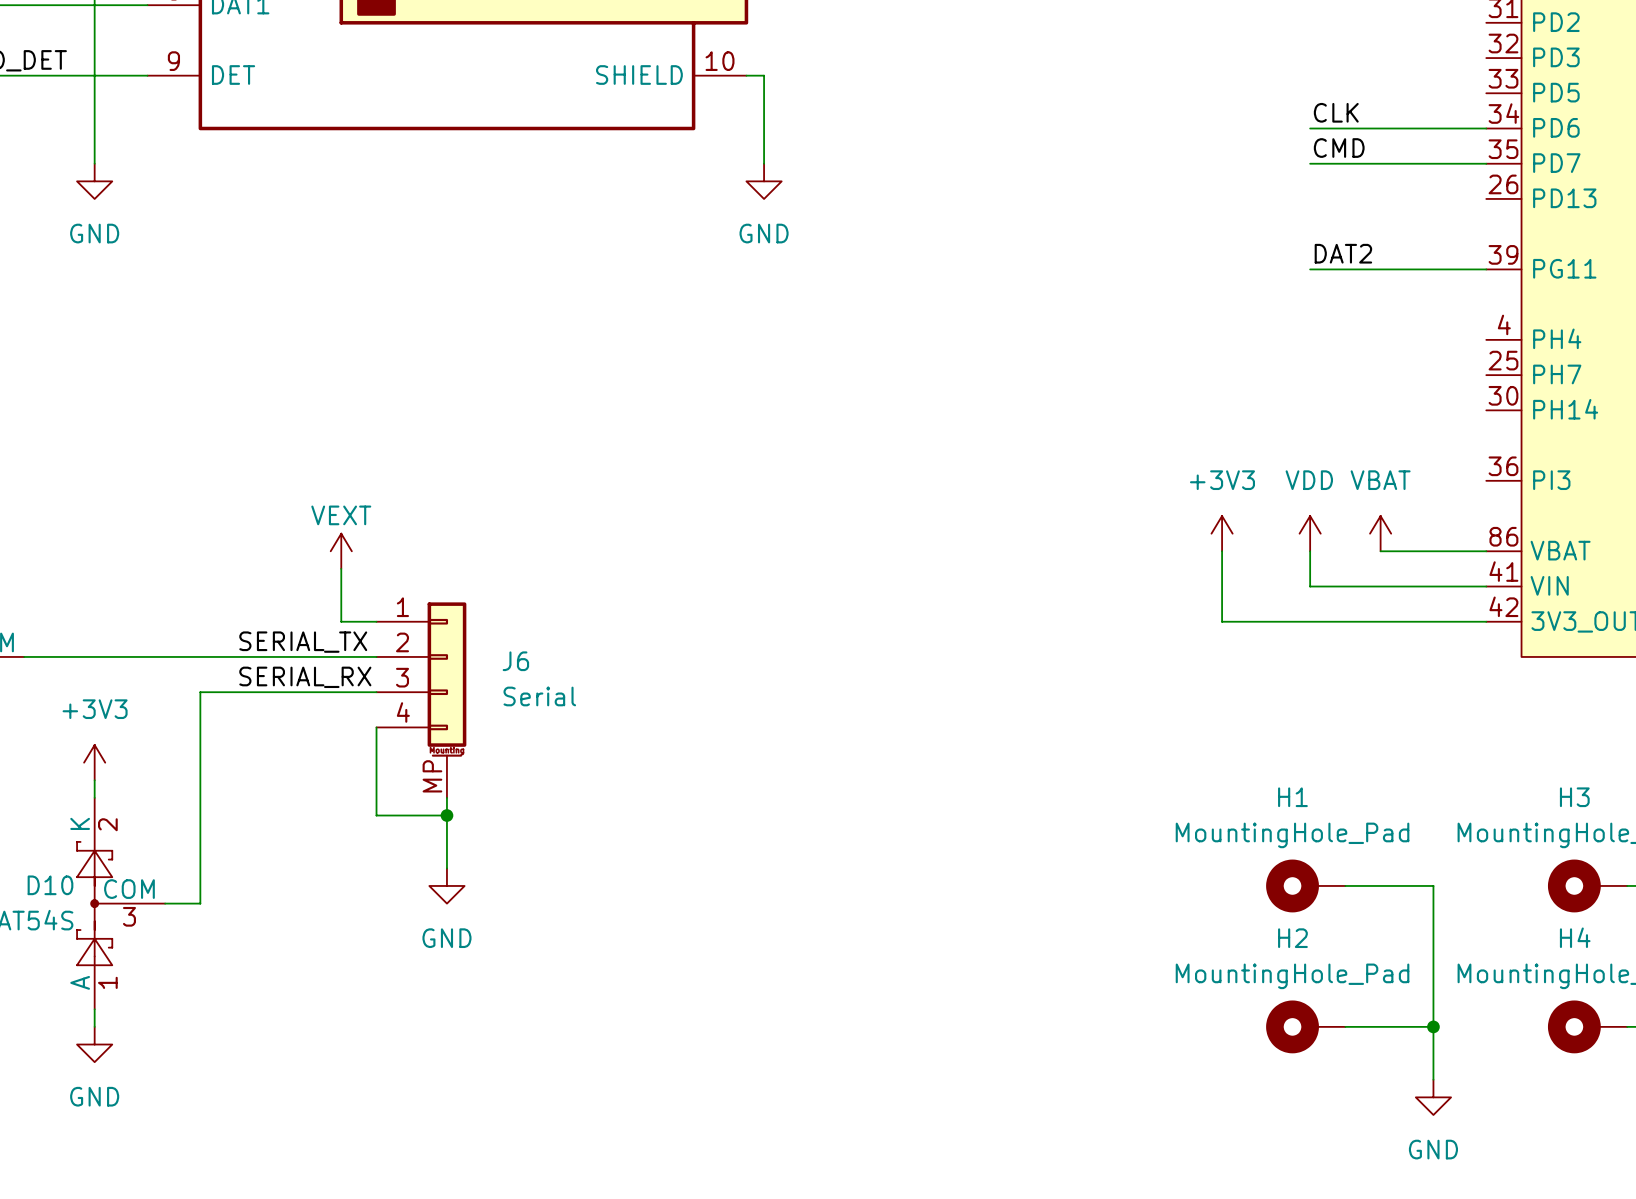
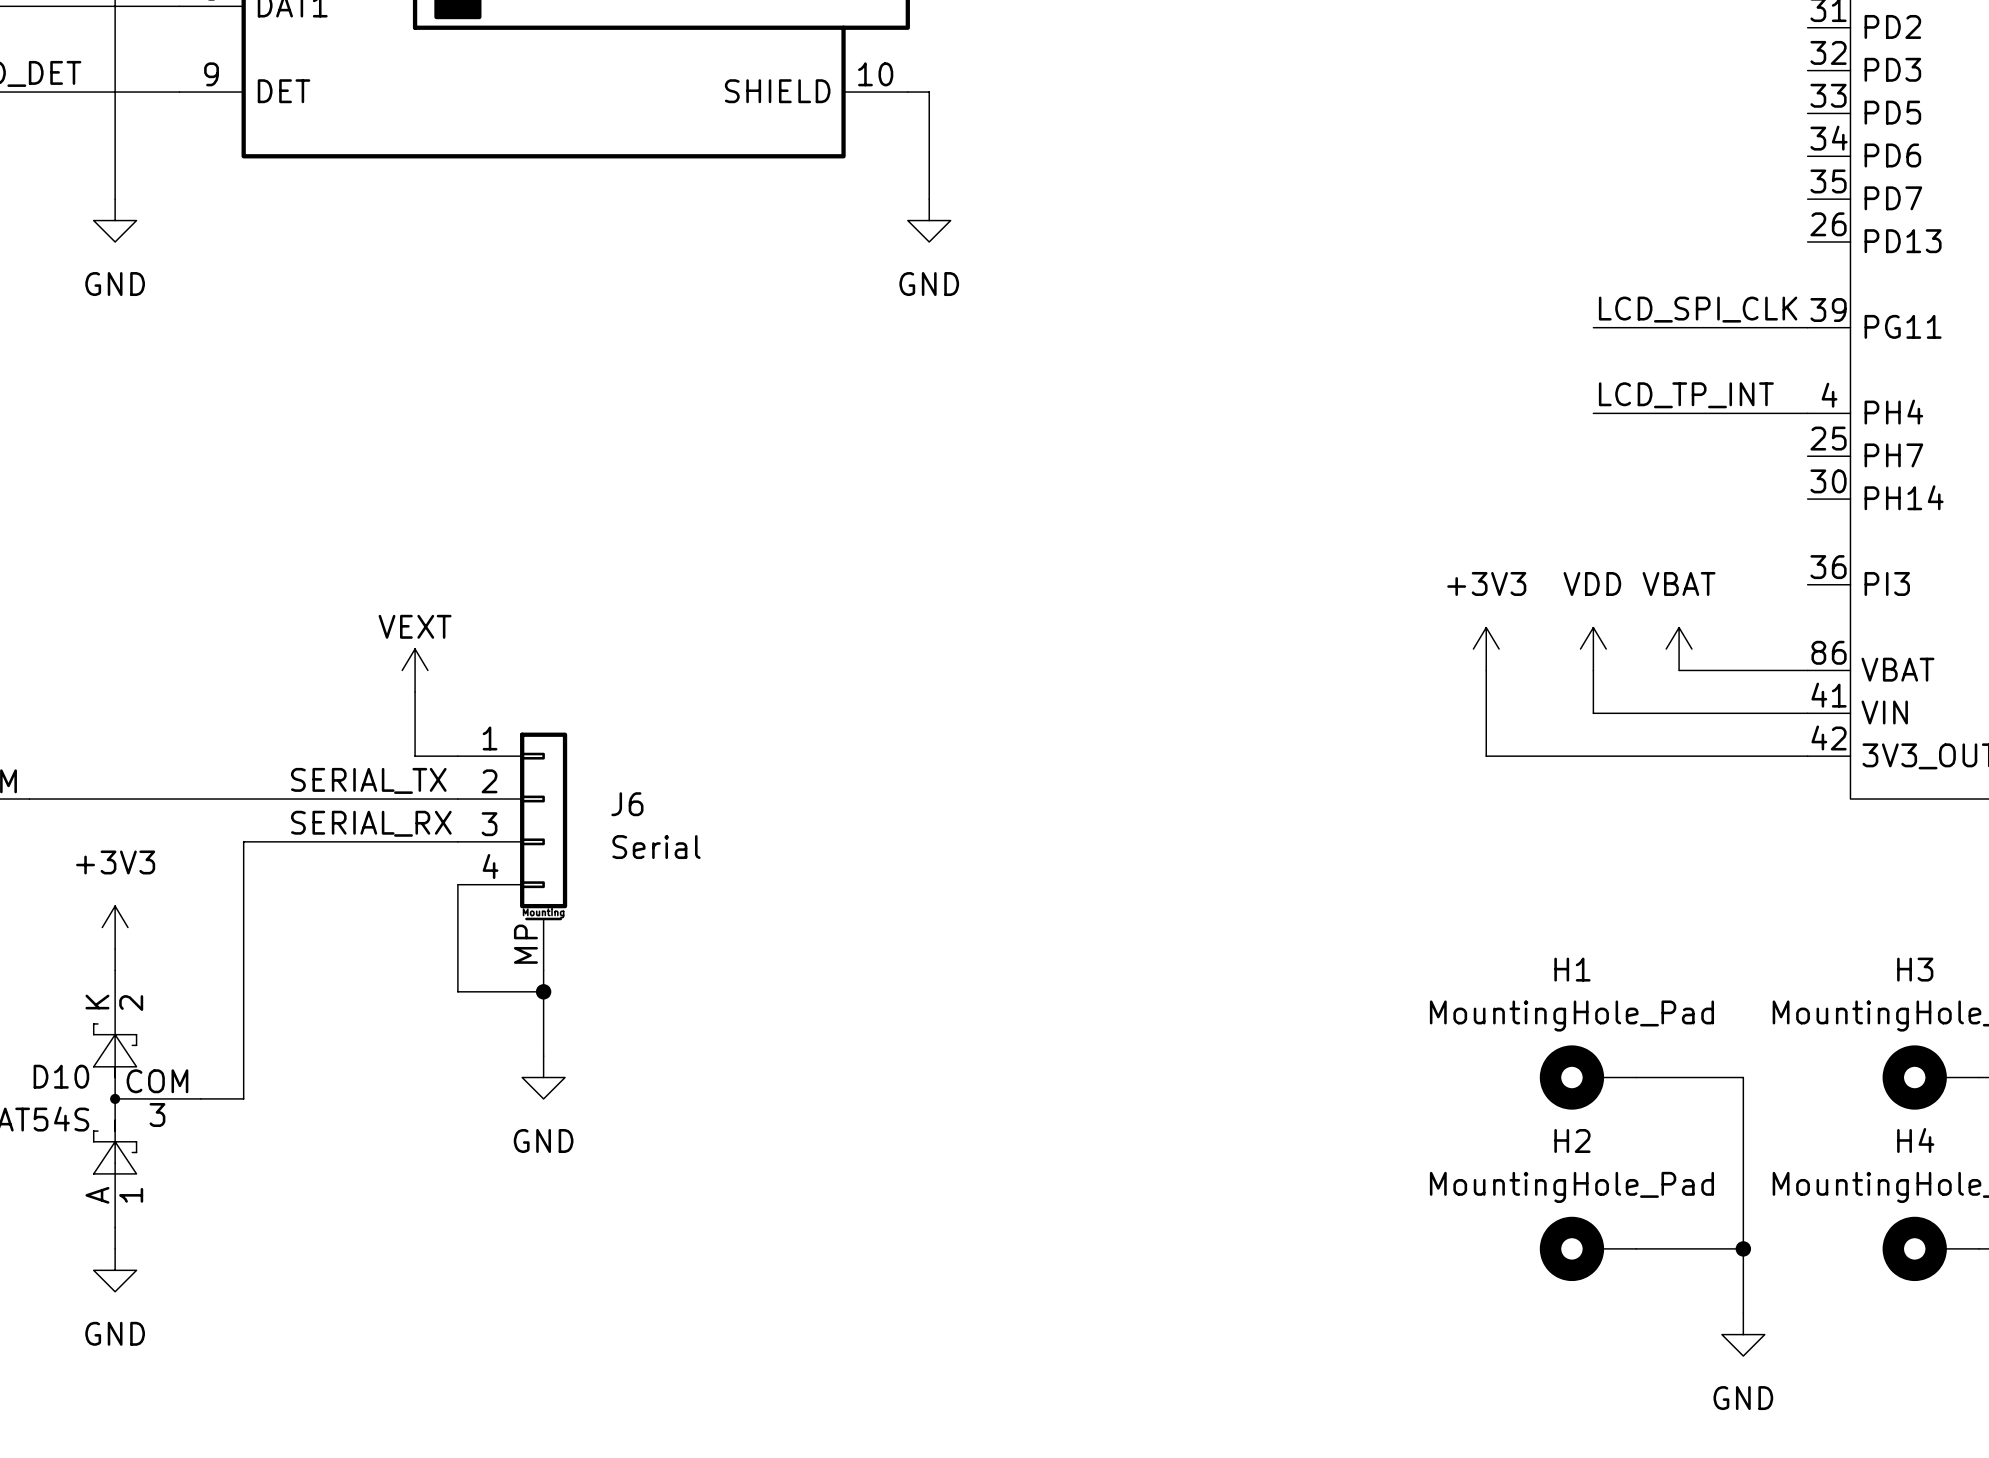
label: CLK (1336, 112) -> none
wire: (1310, 128) (1486, 128) -> none
label: CMD (1339, 148) -> none
wire: (1310, 163) (1486, 163) -> (1593, 413) (1807, 413)
label: DAT2 (1343, 253) -> LCD_SPI_CLK (1698, 309)
label: none -> LCD_TP_INT (1686, 395)

